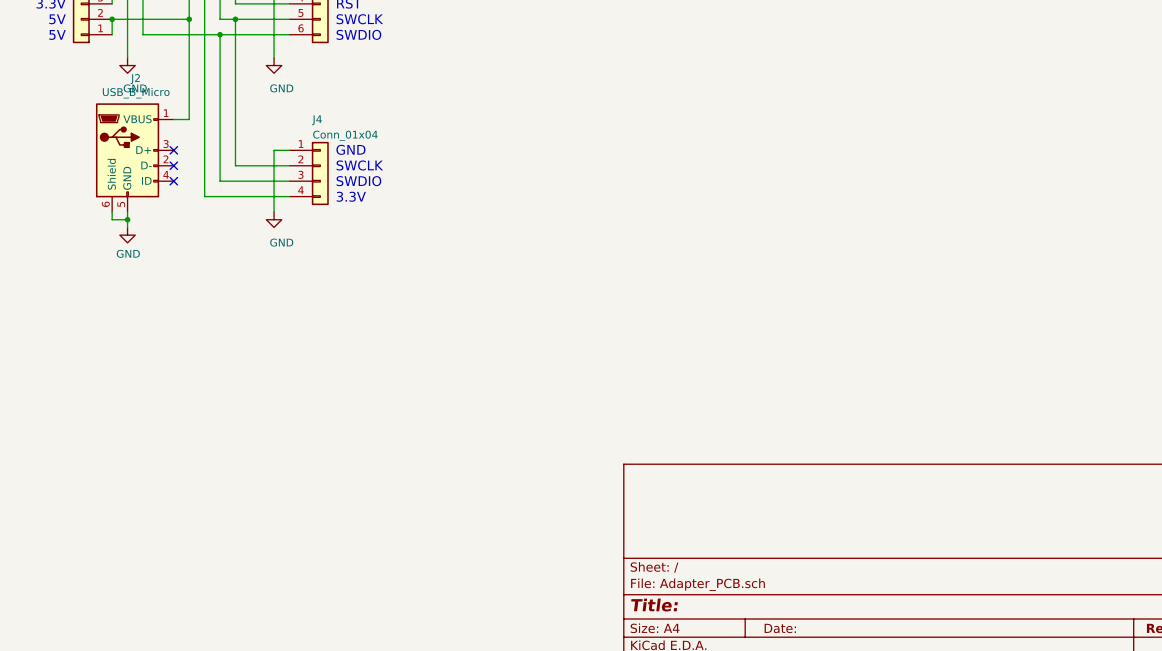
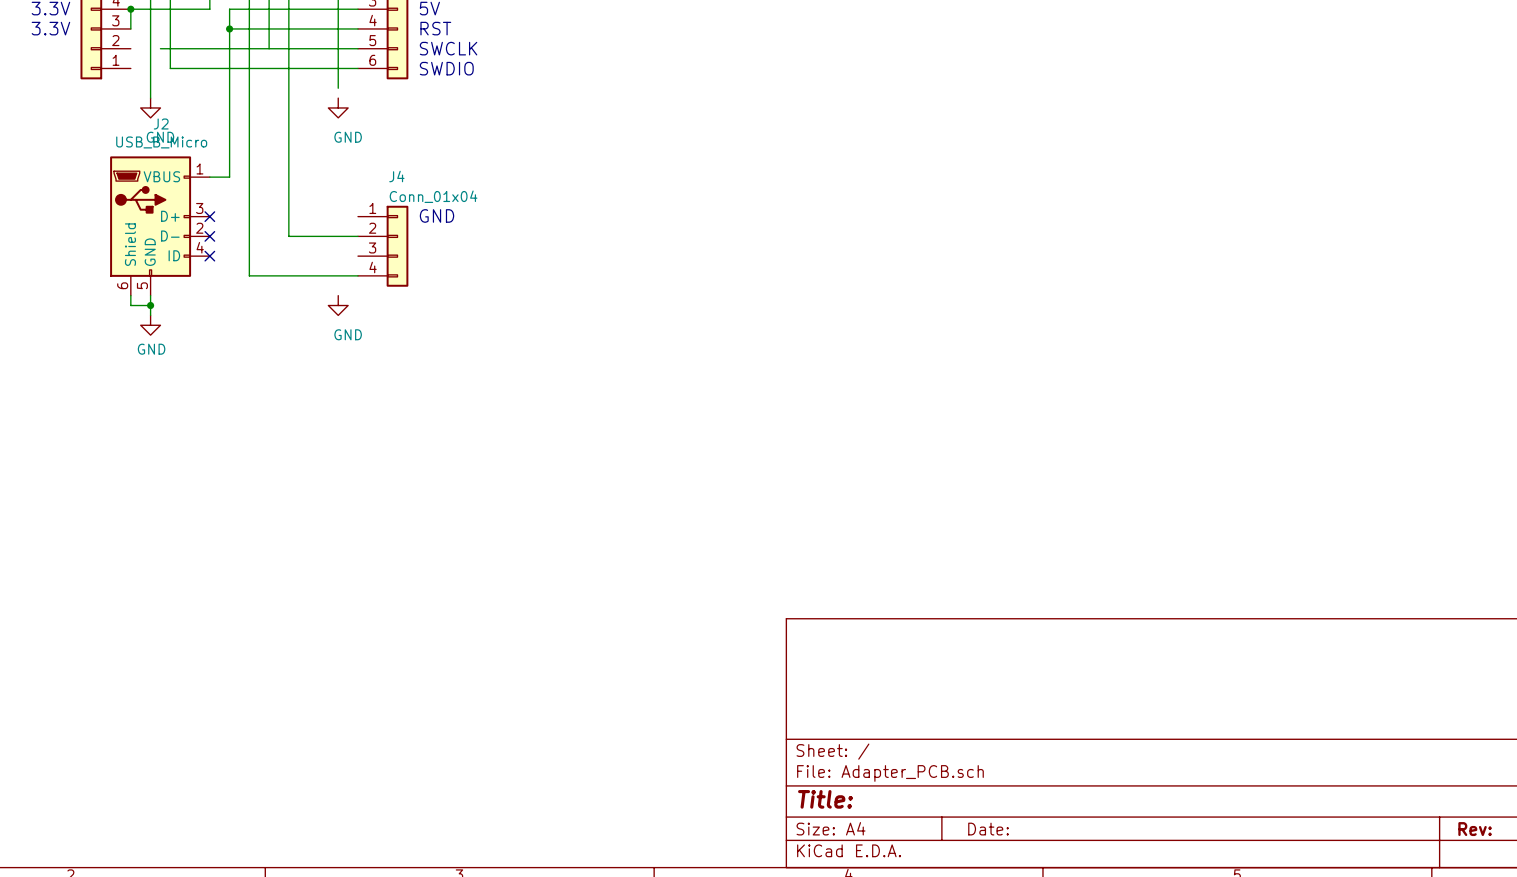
wire: none -> (229, 28) (288, 28) (288, 48)
text: 5V (57, 19) -> none
junction: (112, 19) -> none
wire: (135, 19) (112, 19) (112, 34) -> none
wire: none -> (229, 48) (269, 48)
junction position: (189, 19) -> (229, 28)
junction: (235, 19) -> none
text: 5V (57, 34) -> none
wire: (220, 34) (220, 181) (289, 181) -> none
junction: (220, 34) -> none
wire: (274, 50) (274, 57) -> none
wire: (289, 150) (274, 150) (274, 212) -> none
text: SWCLK (359, 165) -> none
text: SWDIO (358, 181) -> none
text: 3.3V (351, 196) -> none

